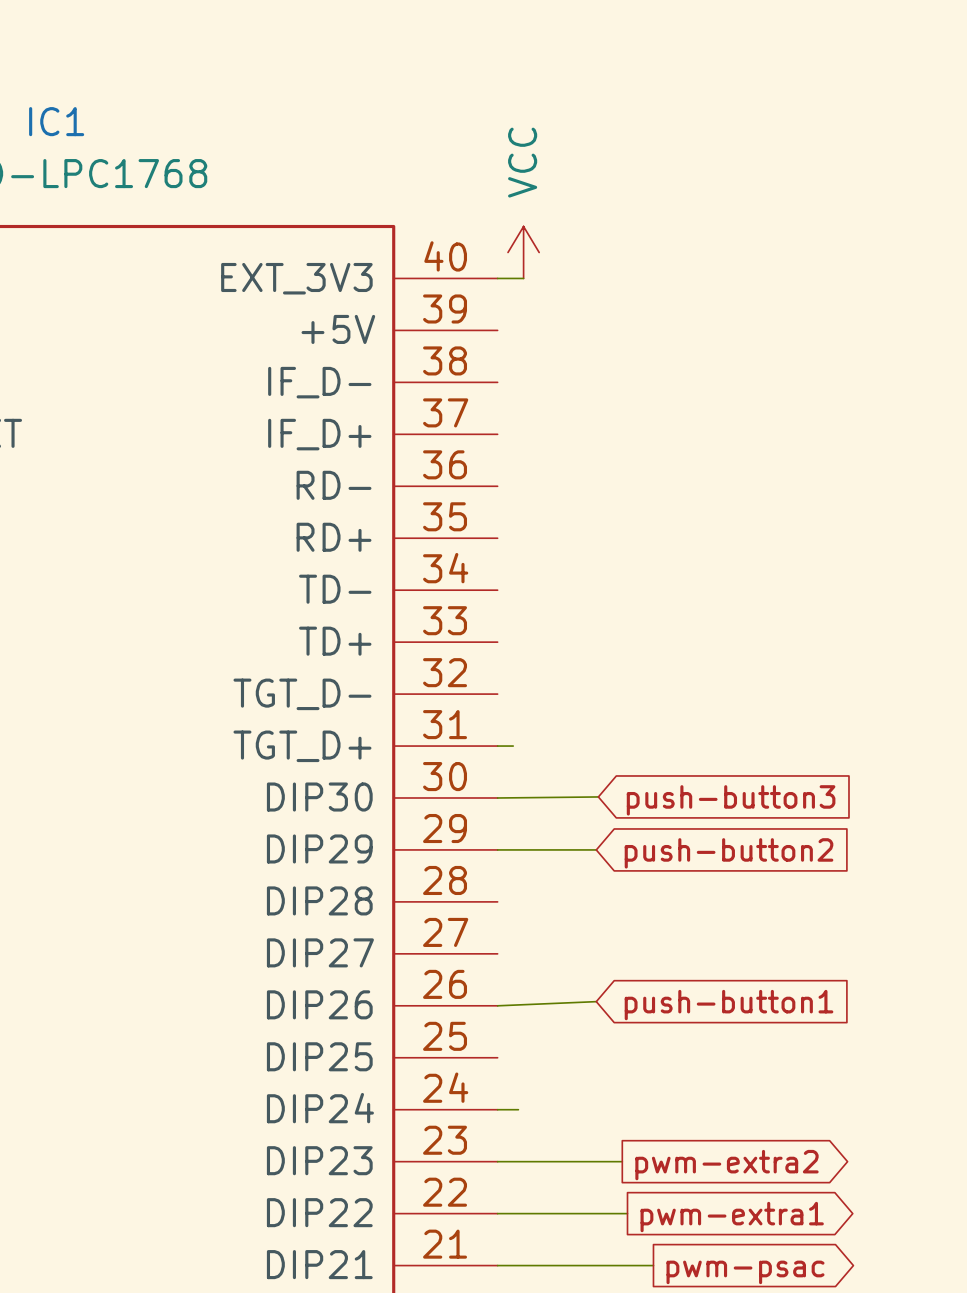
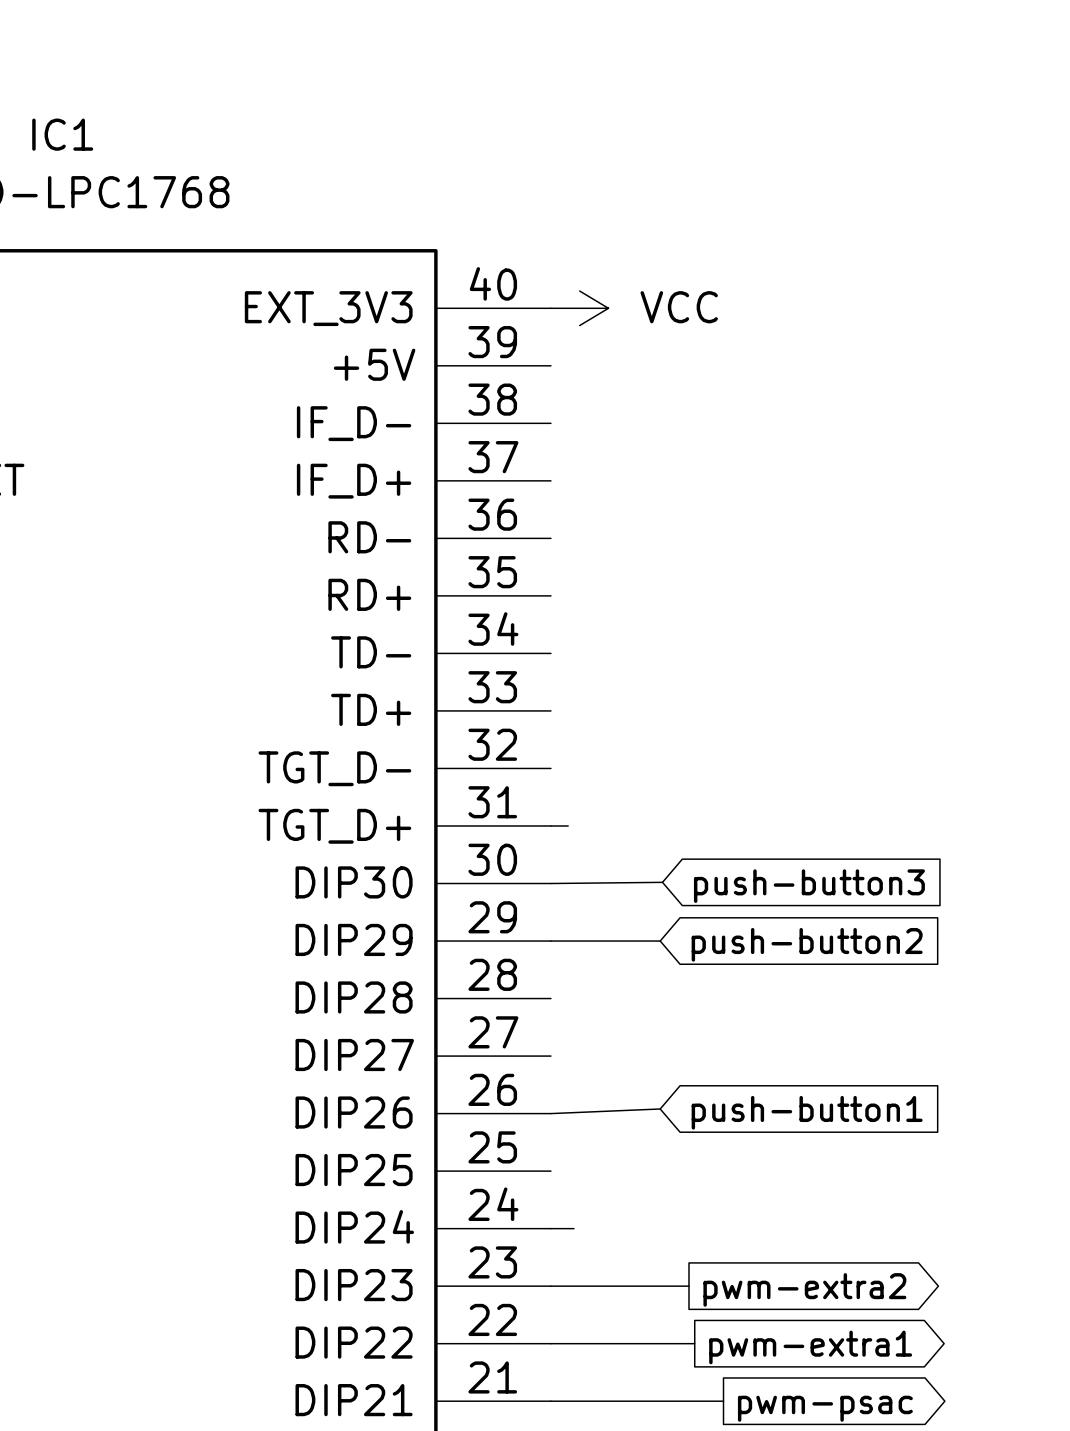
power symbol rotation: 0° (523, 252) -> 90° clockwise (579, 308)

